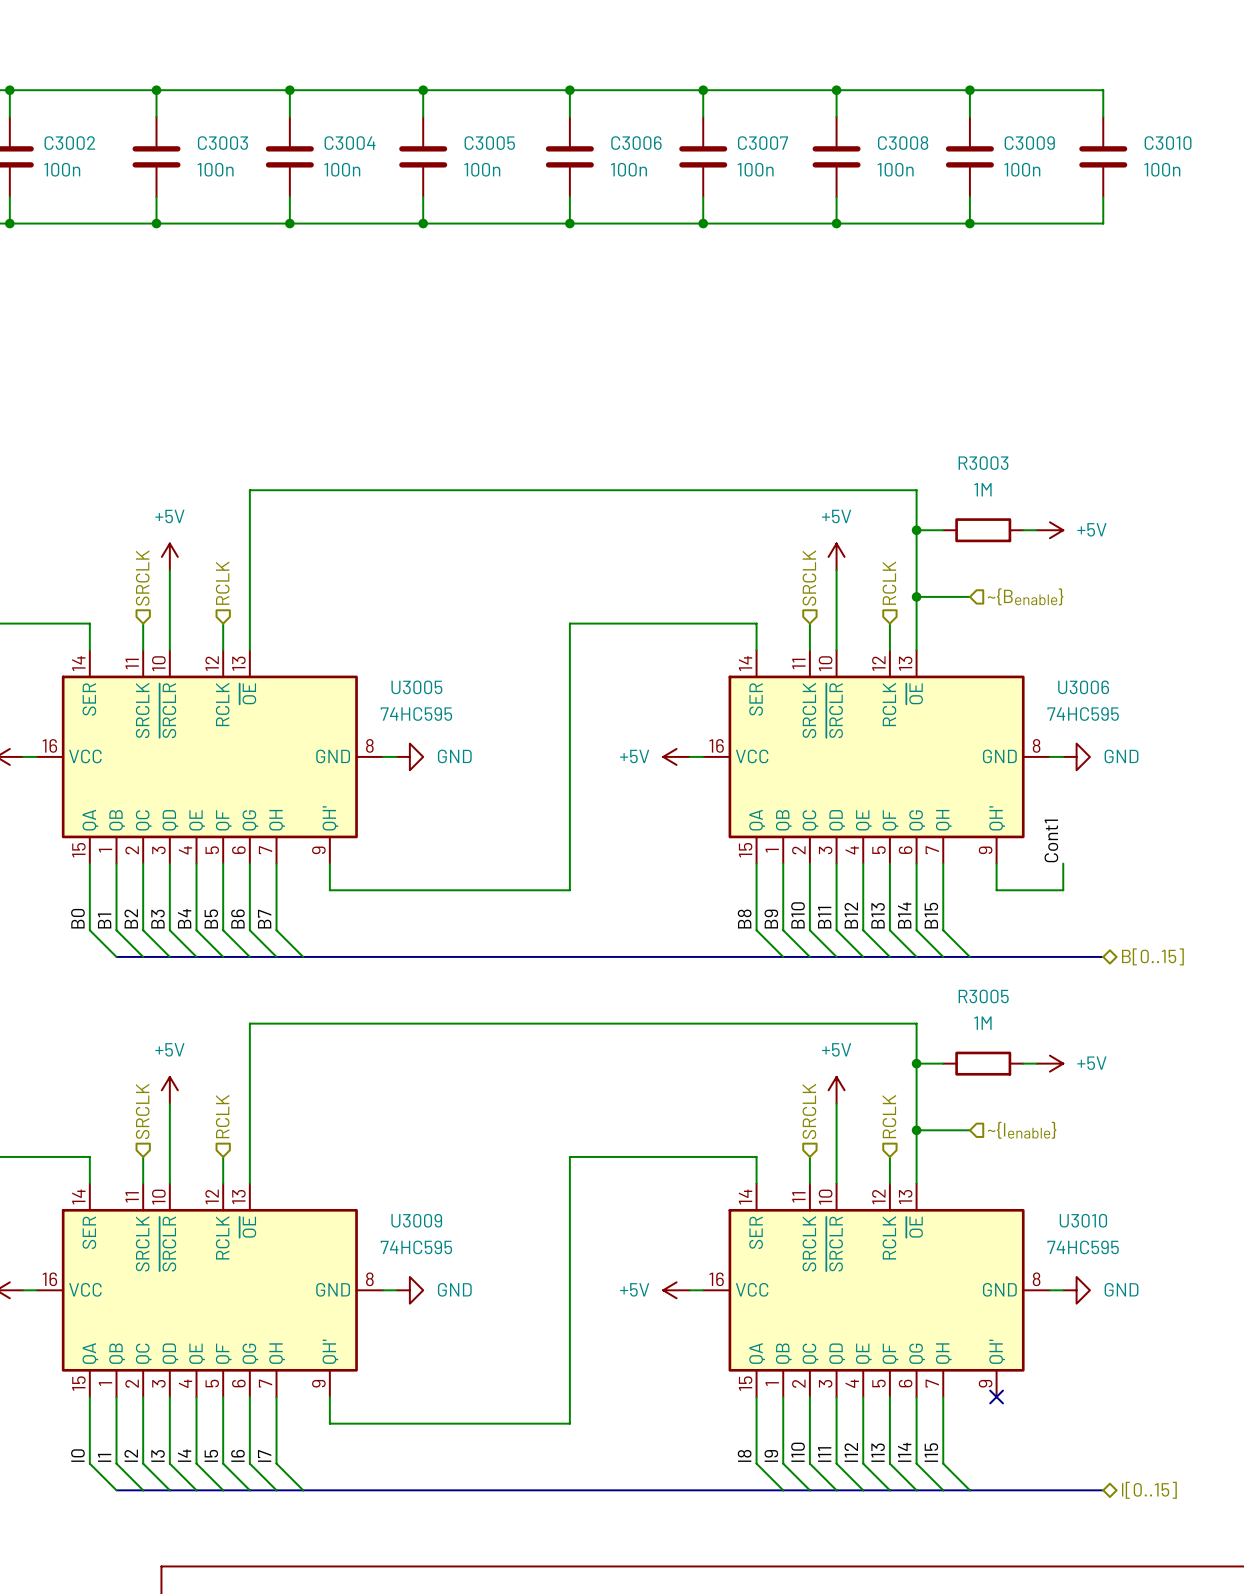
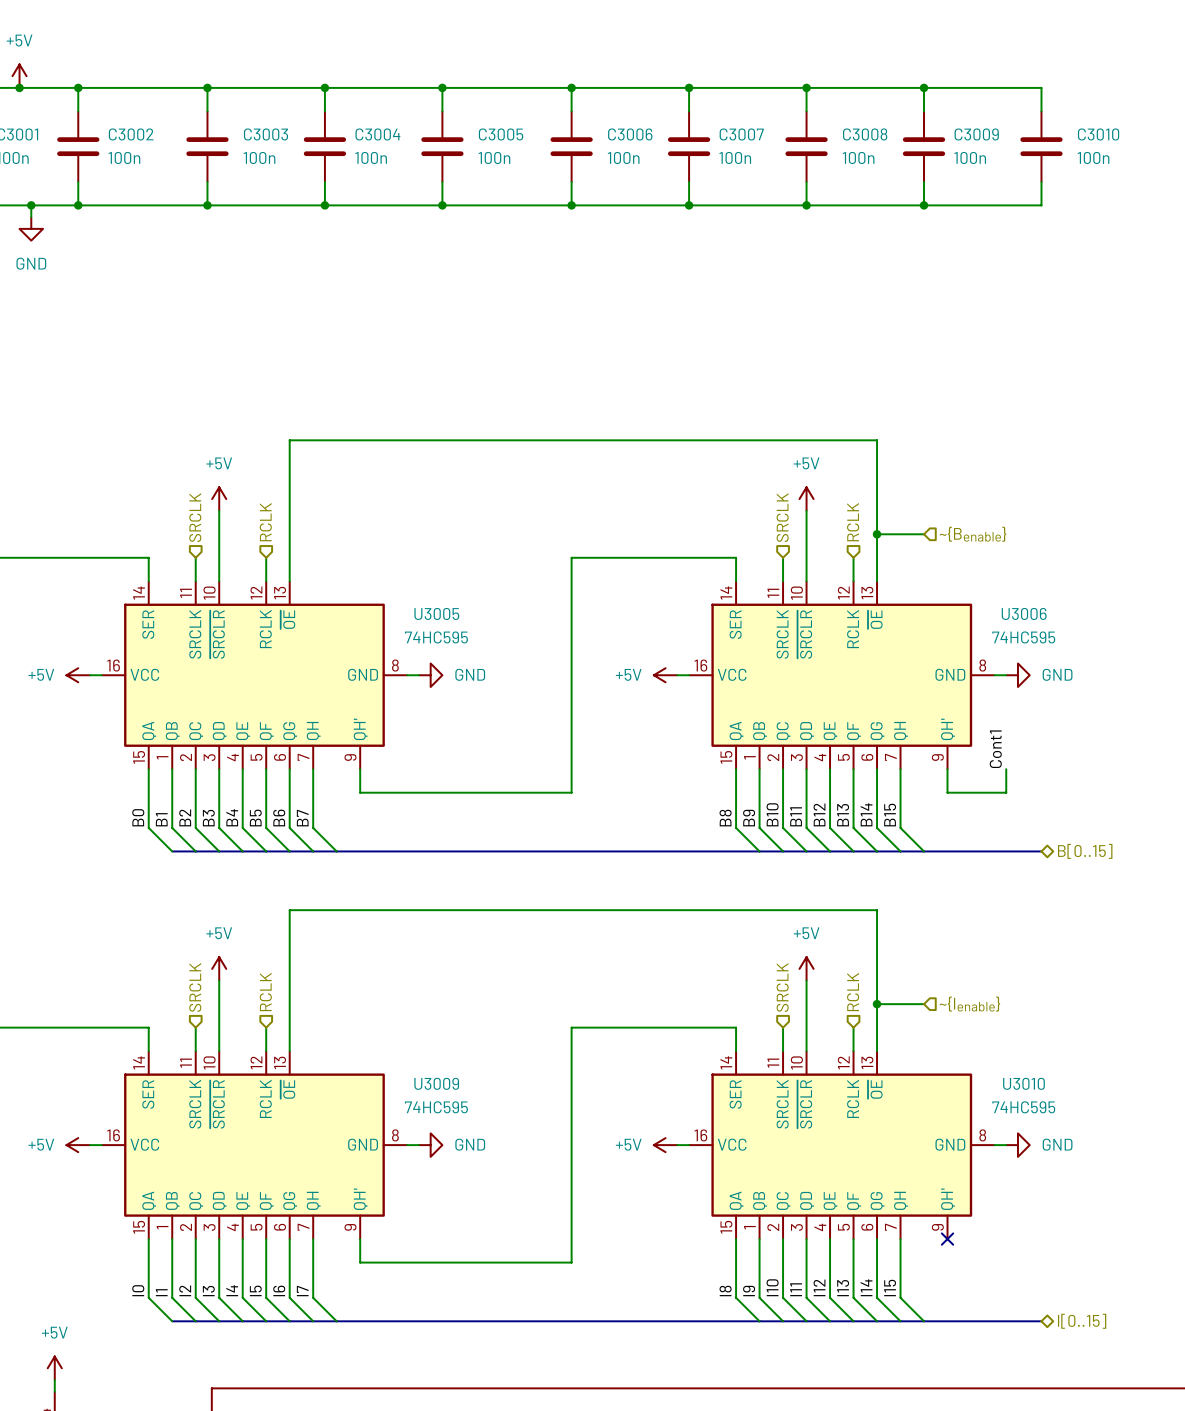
wire: (916, 530) (943, 530) -> none
junction: (916, 530) -> none
R3003: 1M (983, 530) -> none
wire: (1023, 530) (1036, 530) -> none
power symbol: +5V (1049, 530) -> none
wire: (916, 1063) (943, 1063) -> none
junction: (916, 1063) -> none
R3005: 1M (983, 1063) -> none
wire: (1023, 1063) (1036, 1063) -> none
power symbol: +5V (1049, 1063) -> none

